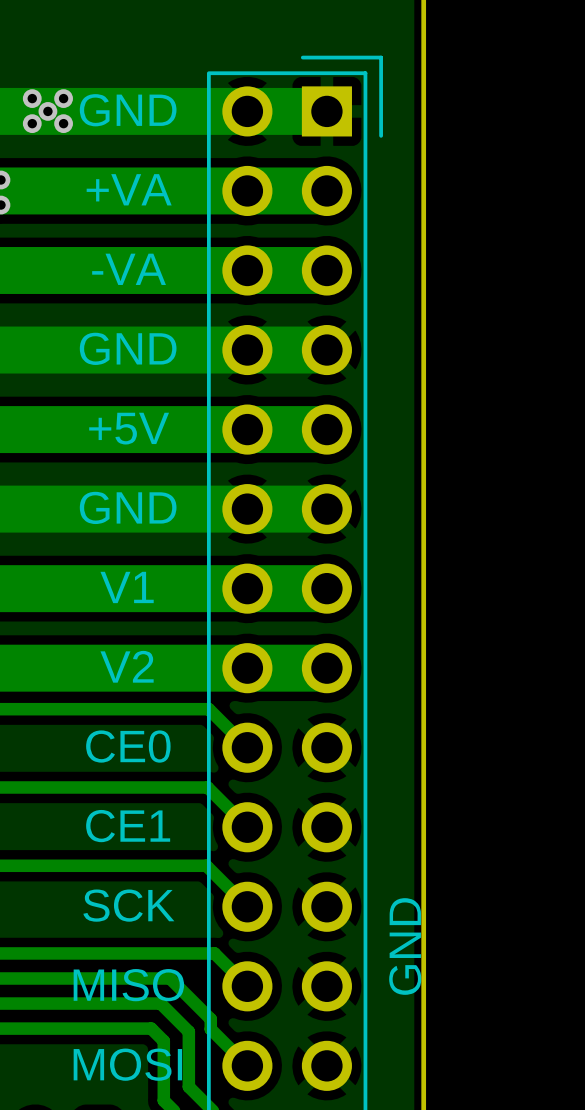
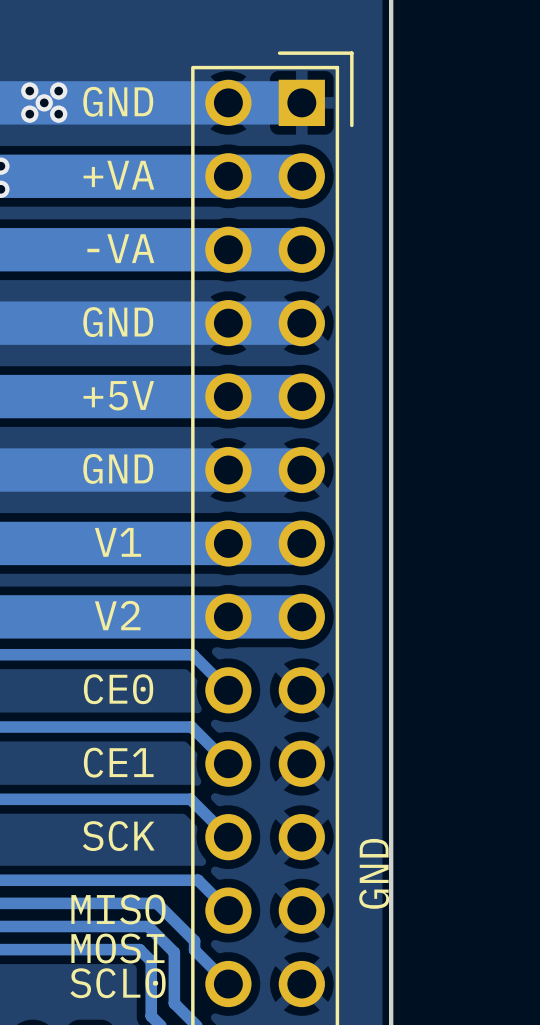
part text: none -> MOSI (117, 948)
part text: MOSI (127, 1064) -> SCL0 (118, 983)

